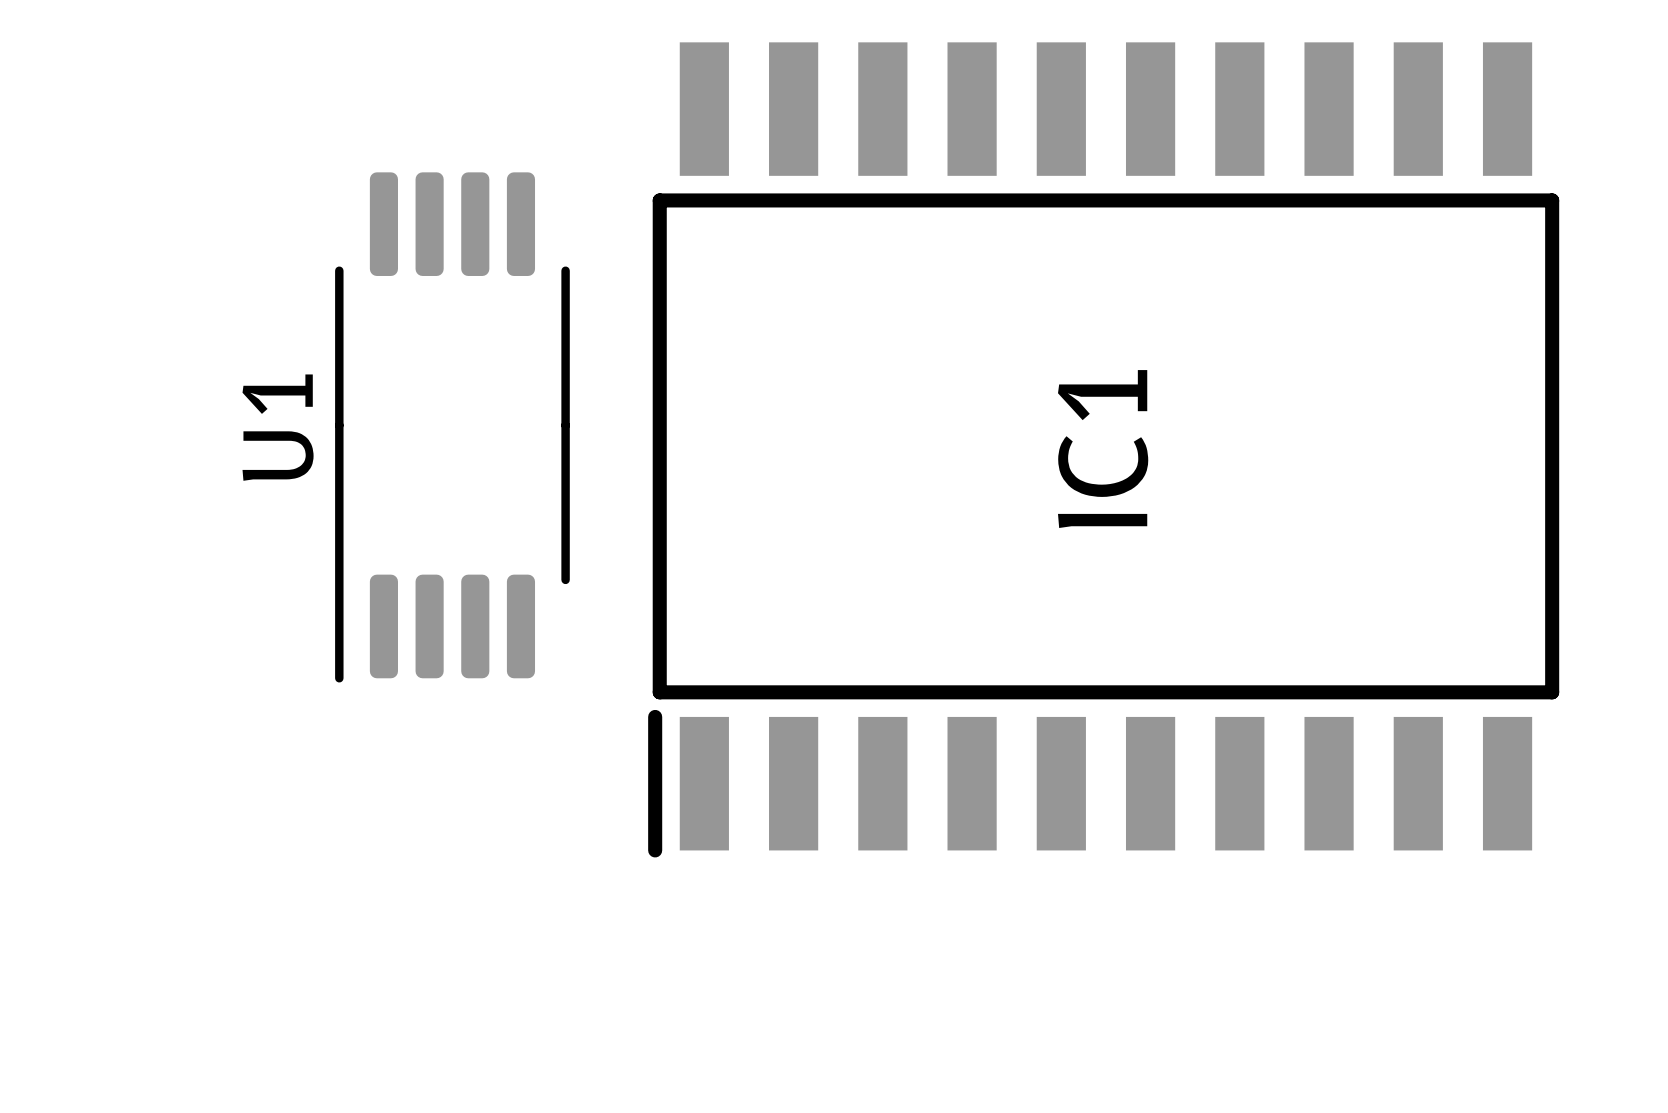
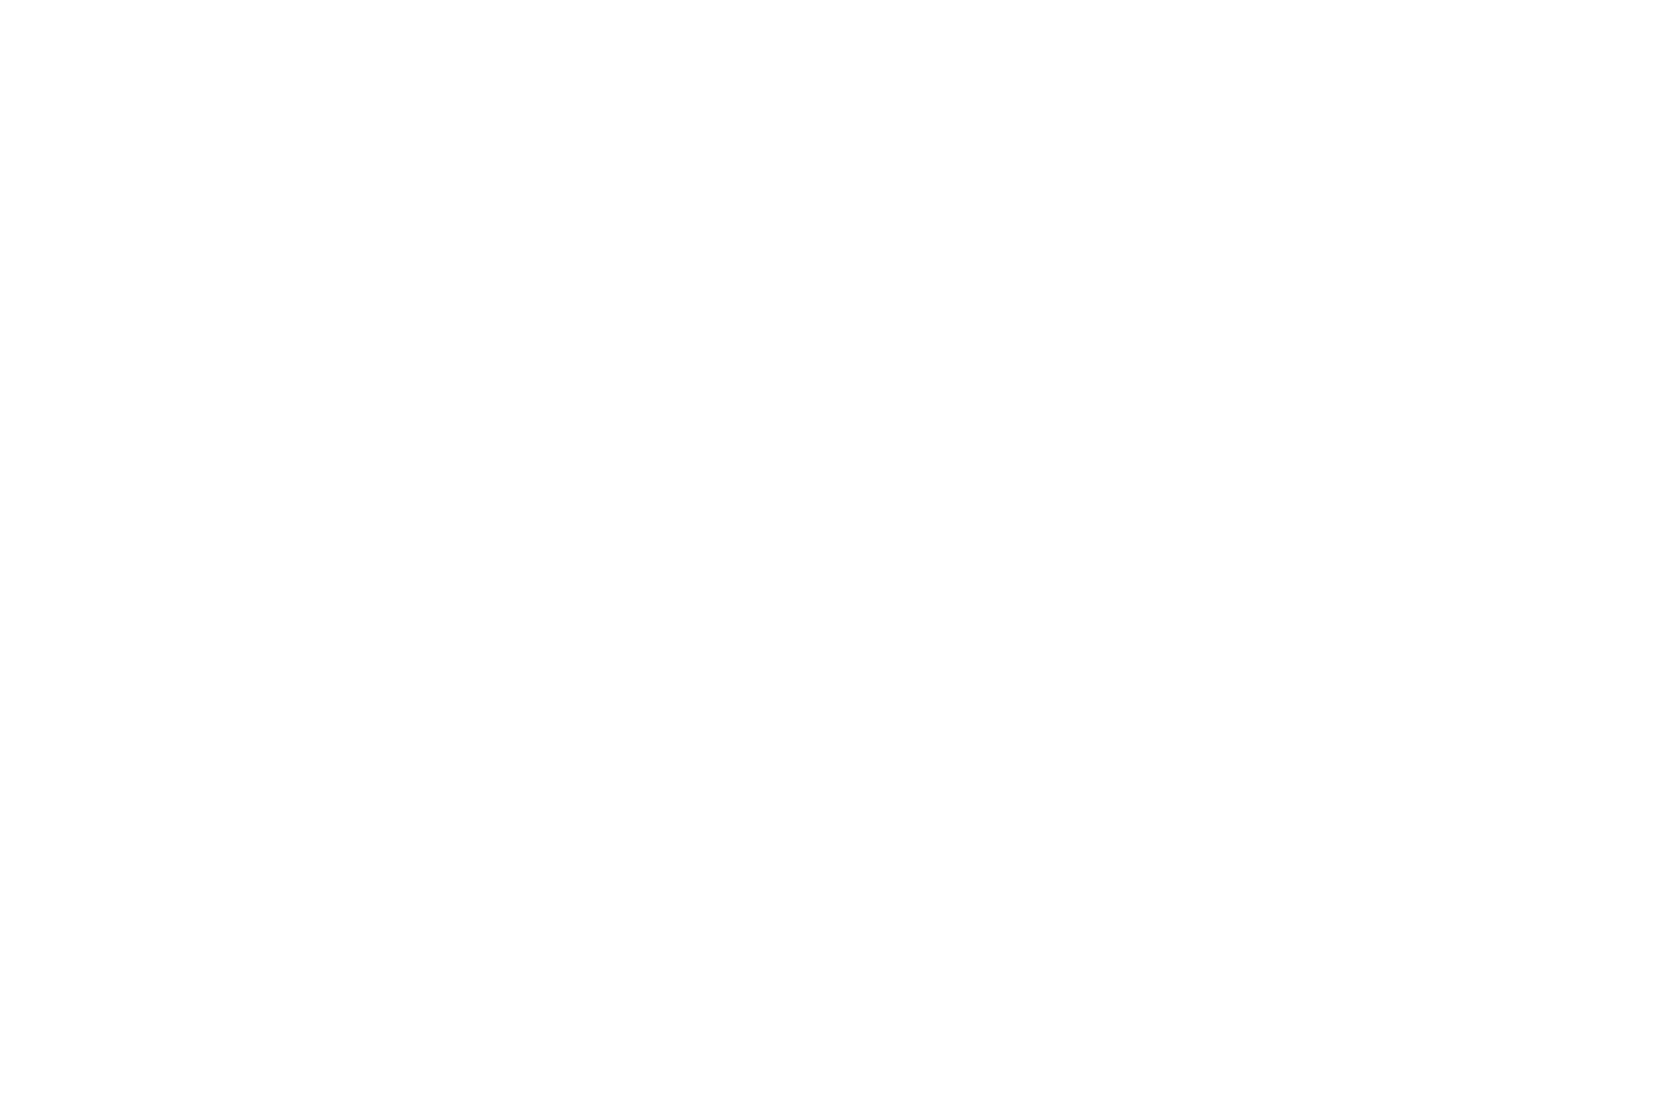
U1: (452, 427) -> none
IC1: (1103, 449) -> none

